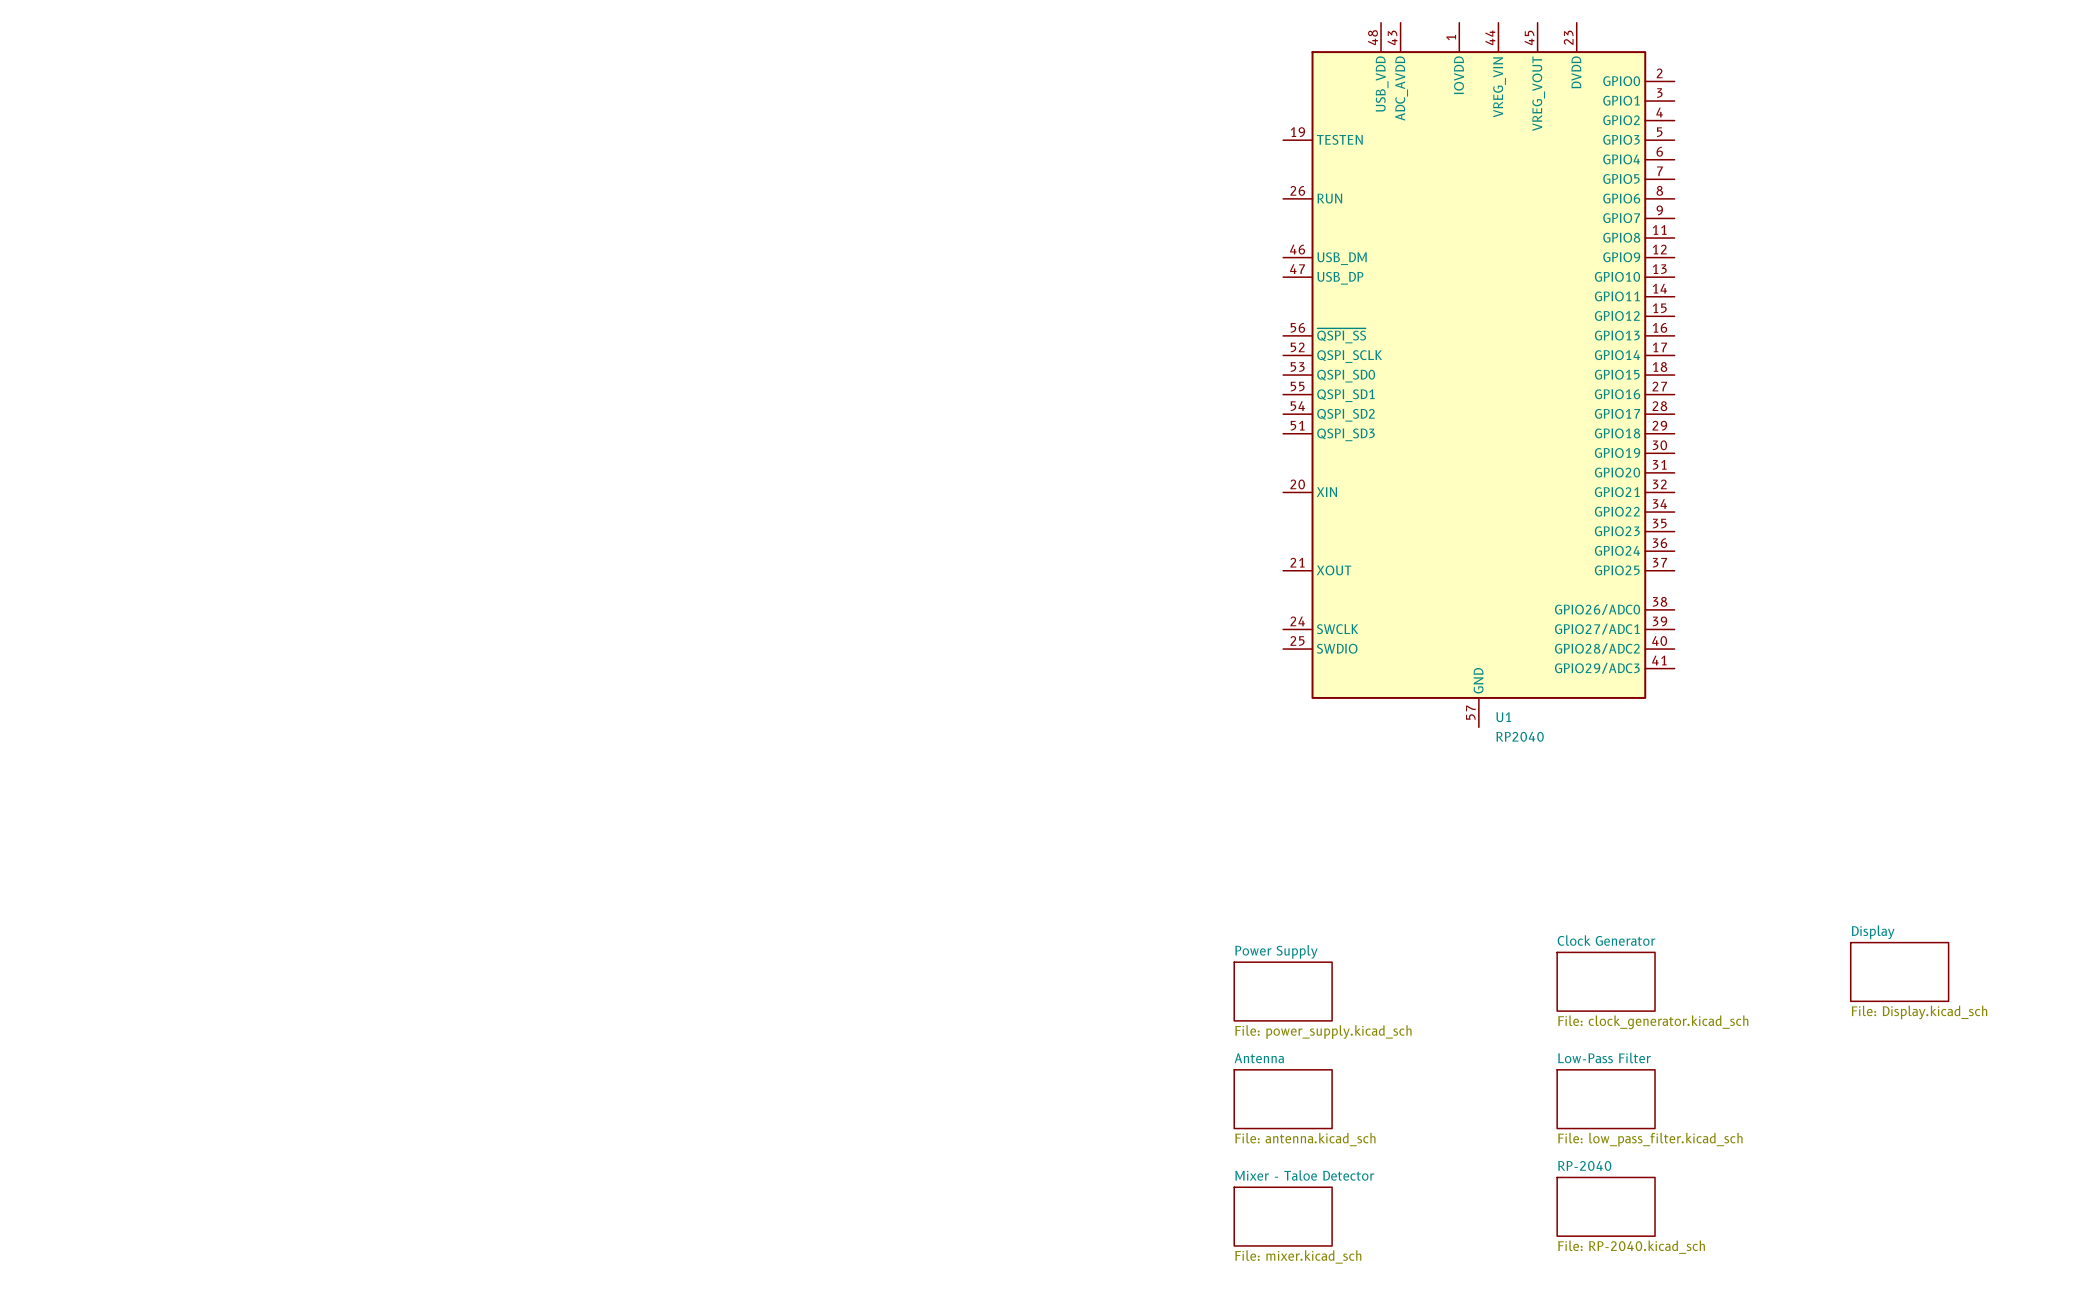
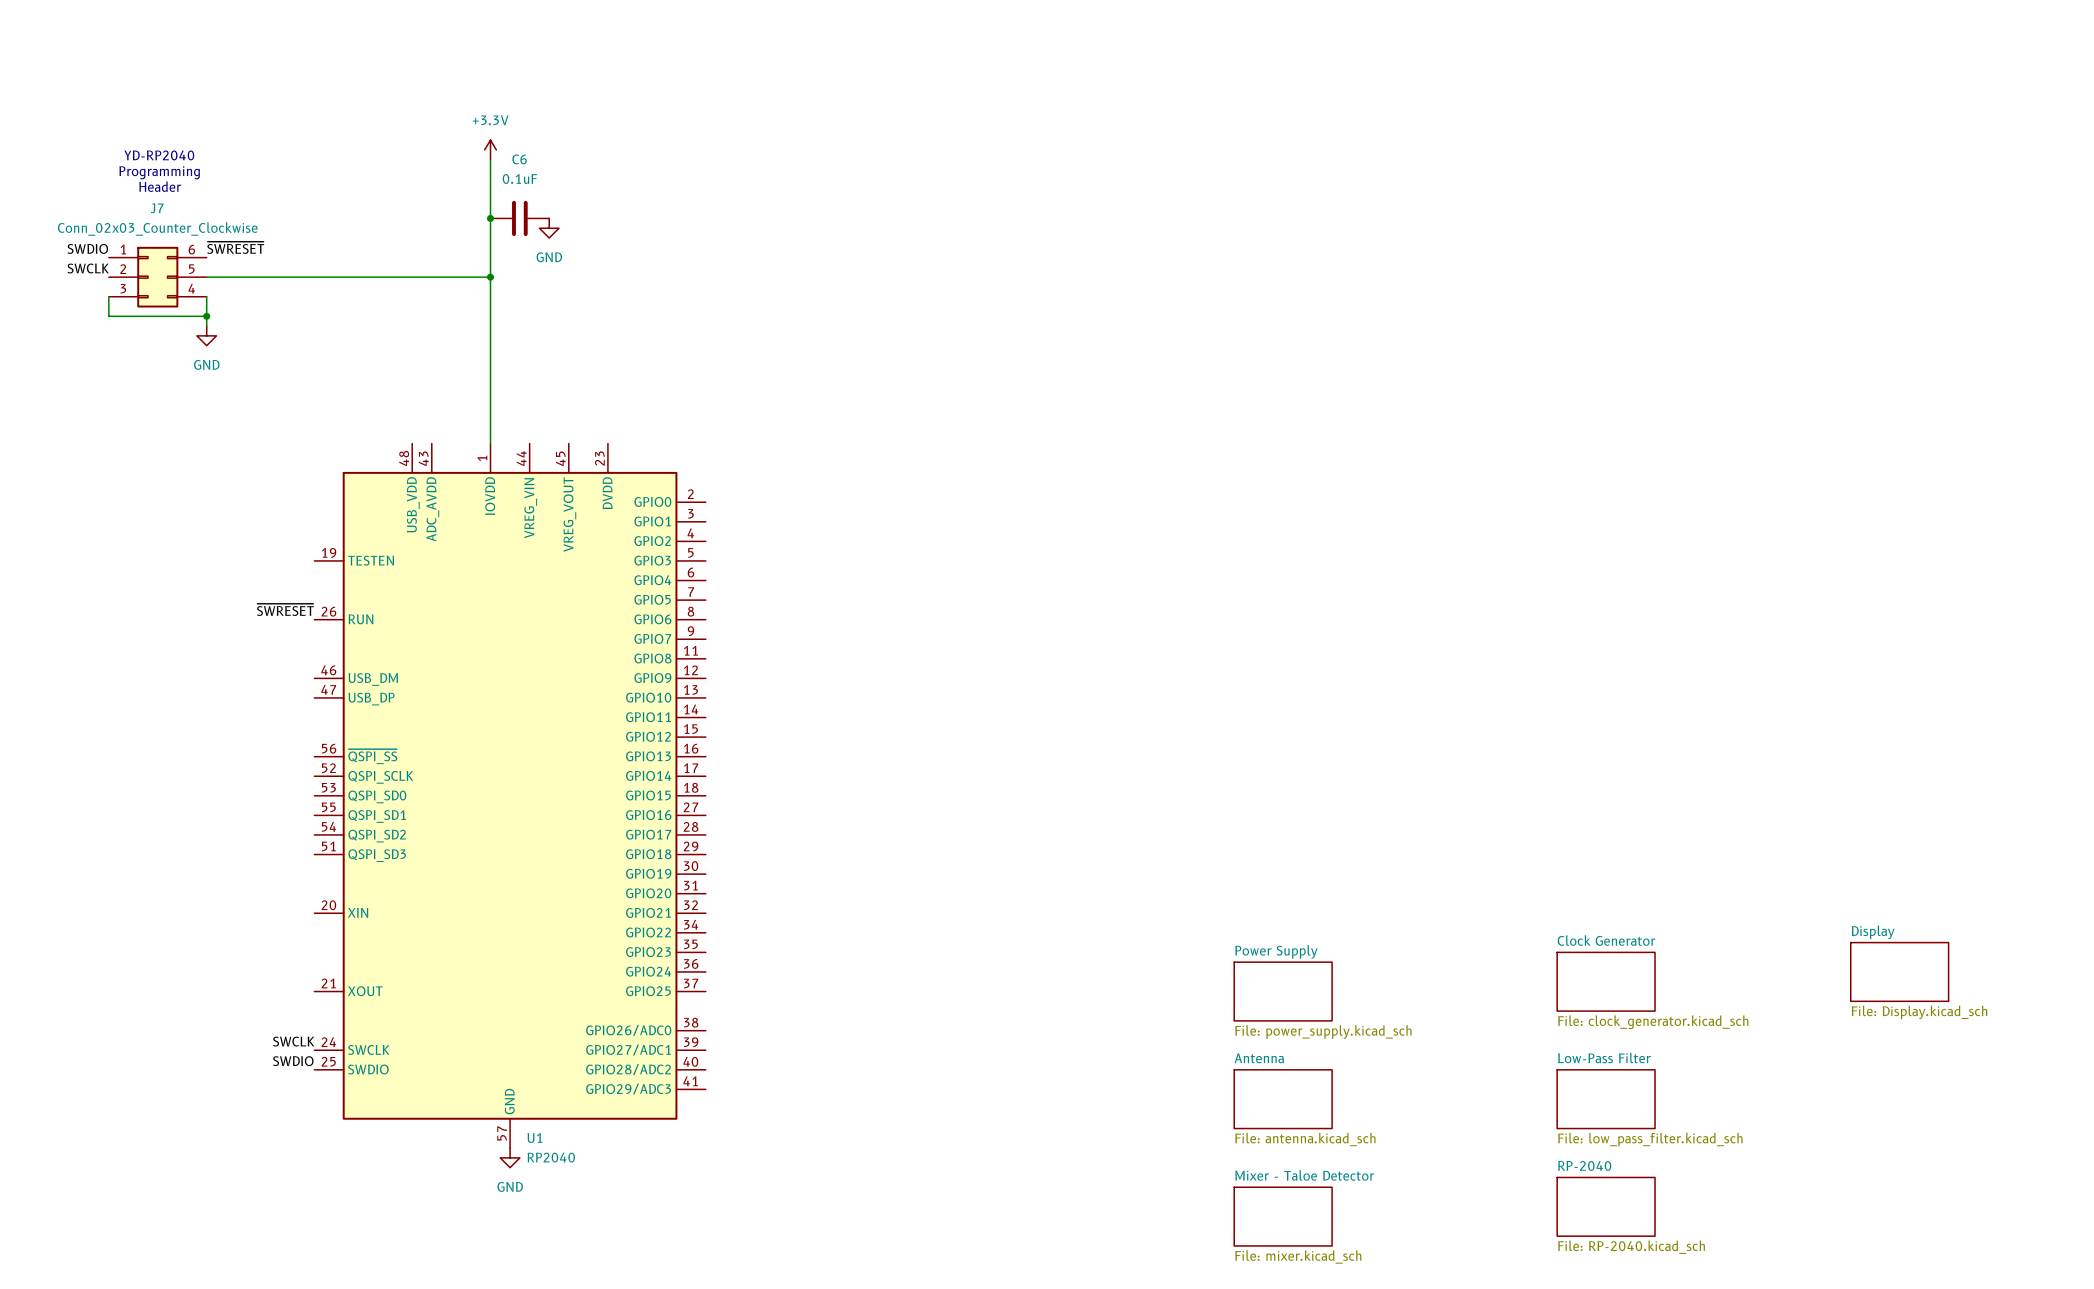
power symbol: none -> +3.3V (490, 149)
text: none -> YD-RP2040 (159, 155)
wire: none -> (490, 159) (490, 443)
text: none -> Programming (159, 172)
text: none -> Header (160, 186)
junction: none -> (490, 218)
C6: none -> 0.1uF (519, 218)
power symbol: none -> GND (549, 228)
label: none -> ~{SWRESET} (235, 247)
label: none -> SWDIO (87, 248)
label: none -> SWCLK (88, 268)
J7: none -> Conn_02x03_Counter_Clockwise (157, 277)
wire: none -> (206, 277) (490, 277)
junction: none -> (490, 277)
wire: none -> (108, 296) (108, 316) (206, 316)
wire: none -> (206, 296) (206, 326)
junction: none -> (206, 316)
power symbol: none -> GND (206, 335)
U1 position: (1478, 375) -> (510, 795)
label: none -> ~{SWRESET} (285, 609)
label: none -> SWCLK (293, 1041)
label: none -> SWDIO (293, 1061)
power symbol: none -> GND (510, 1157)

